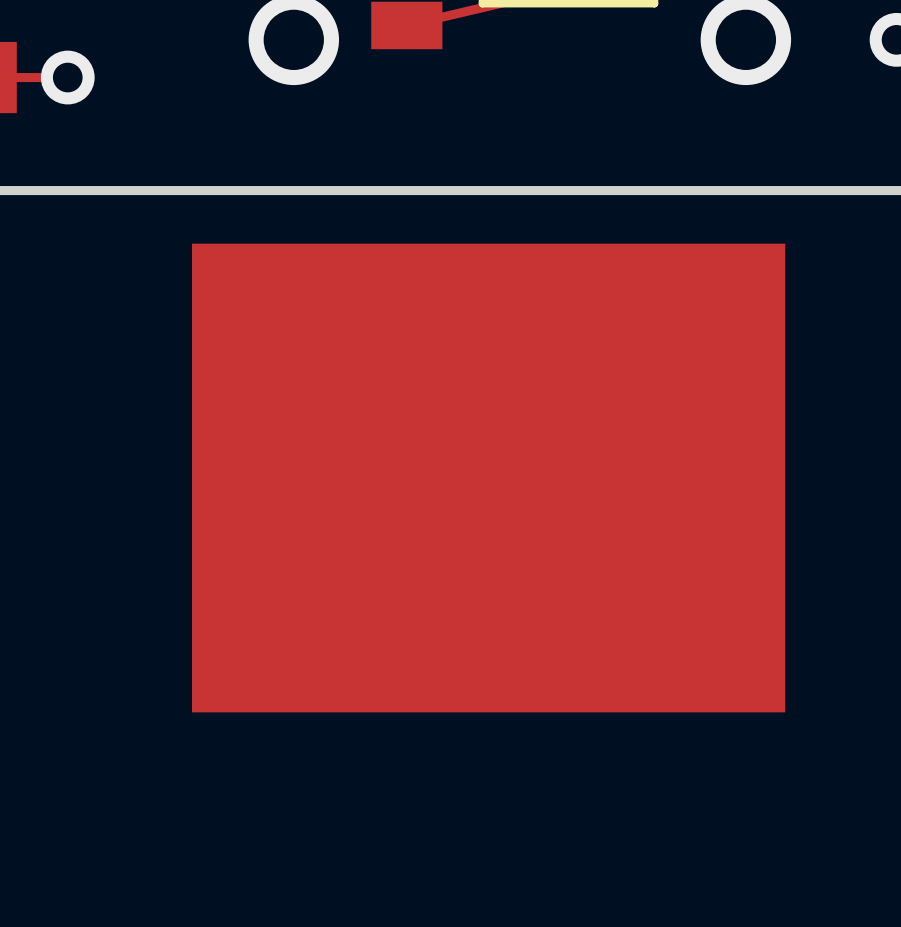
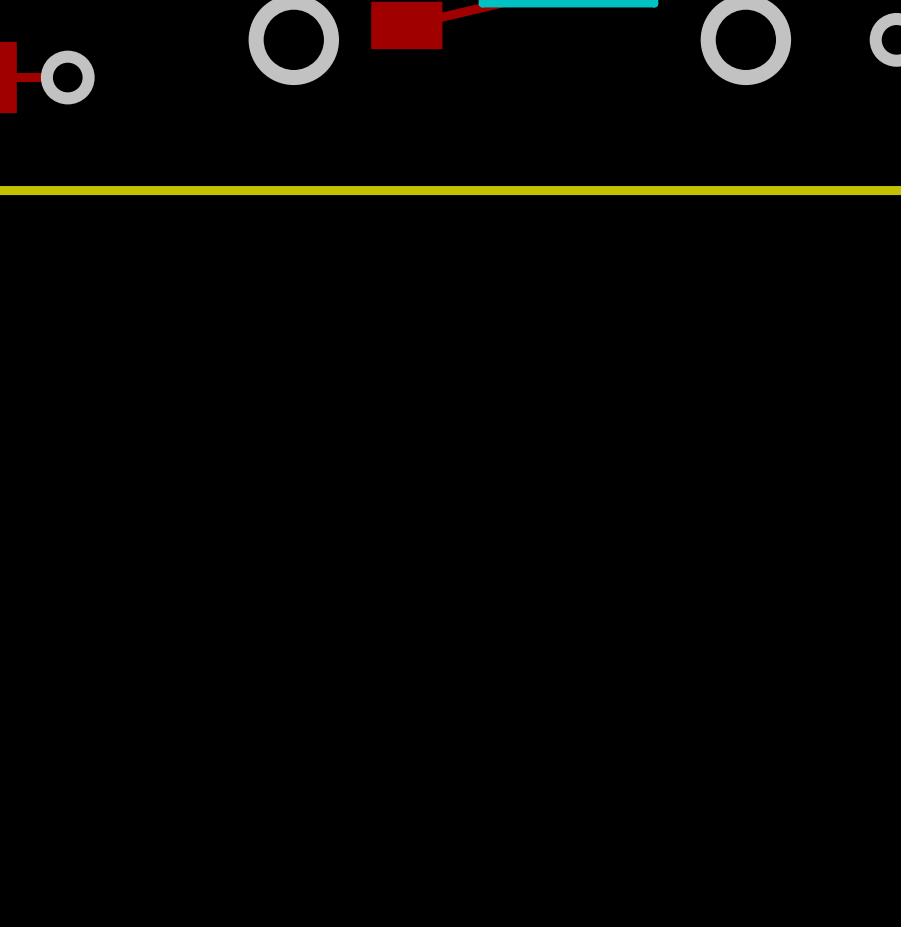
drawing: [191, 243, 786, 713] -> none

